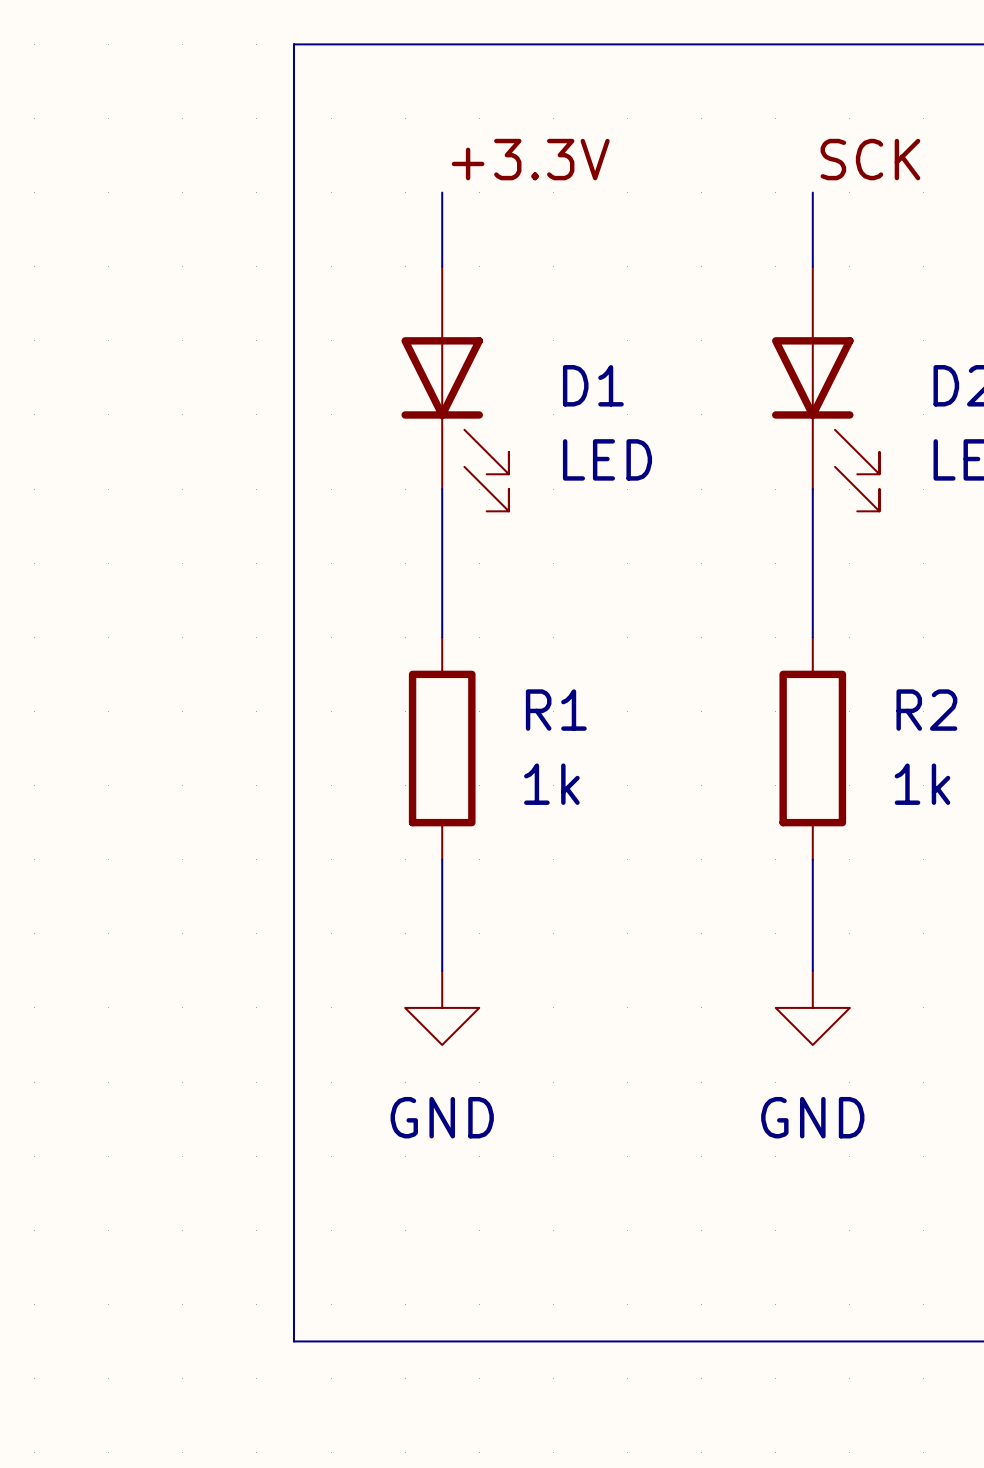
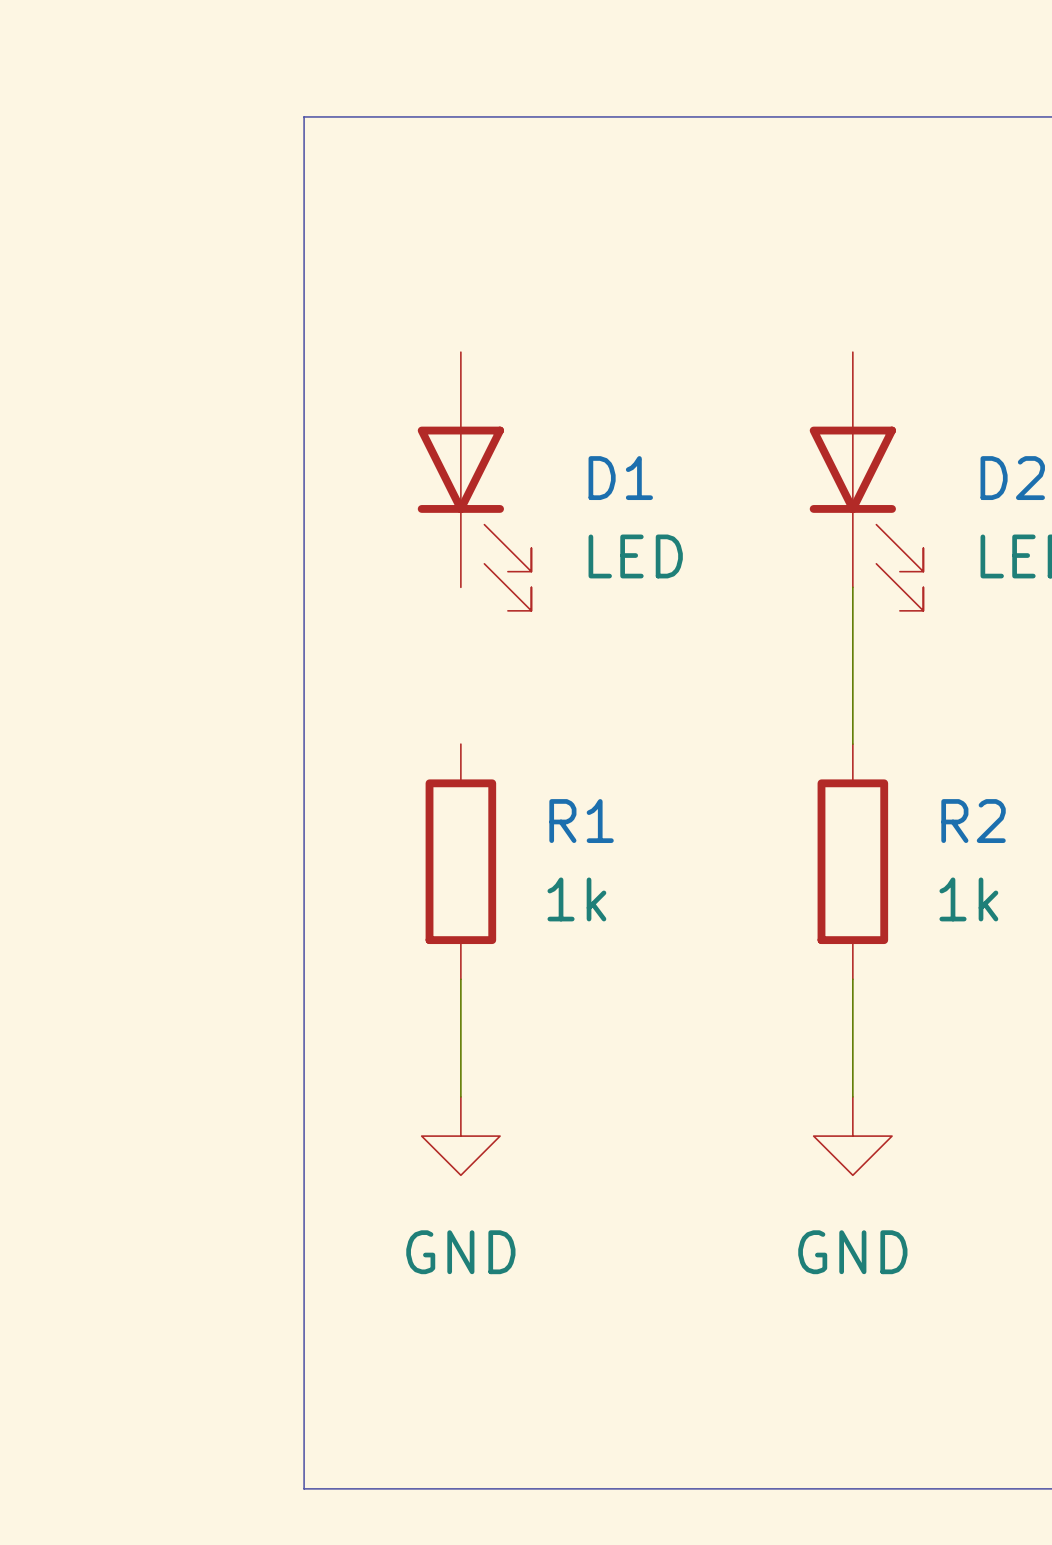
label: +3.3V (530, 159) -> none
label: SCK (870, 159) -> none
wire: (442, 192) (442, 266) -> none
wire: (812, 192) (812, 266) -> none
wire: (442, 489) (442, 637) -> none

